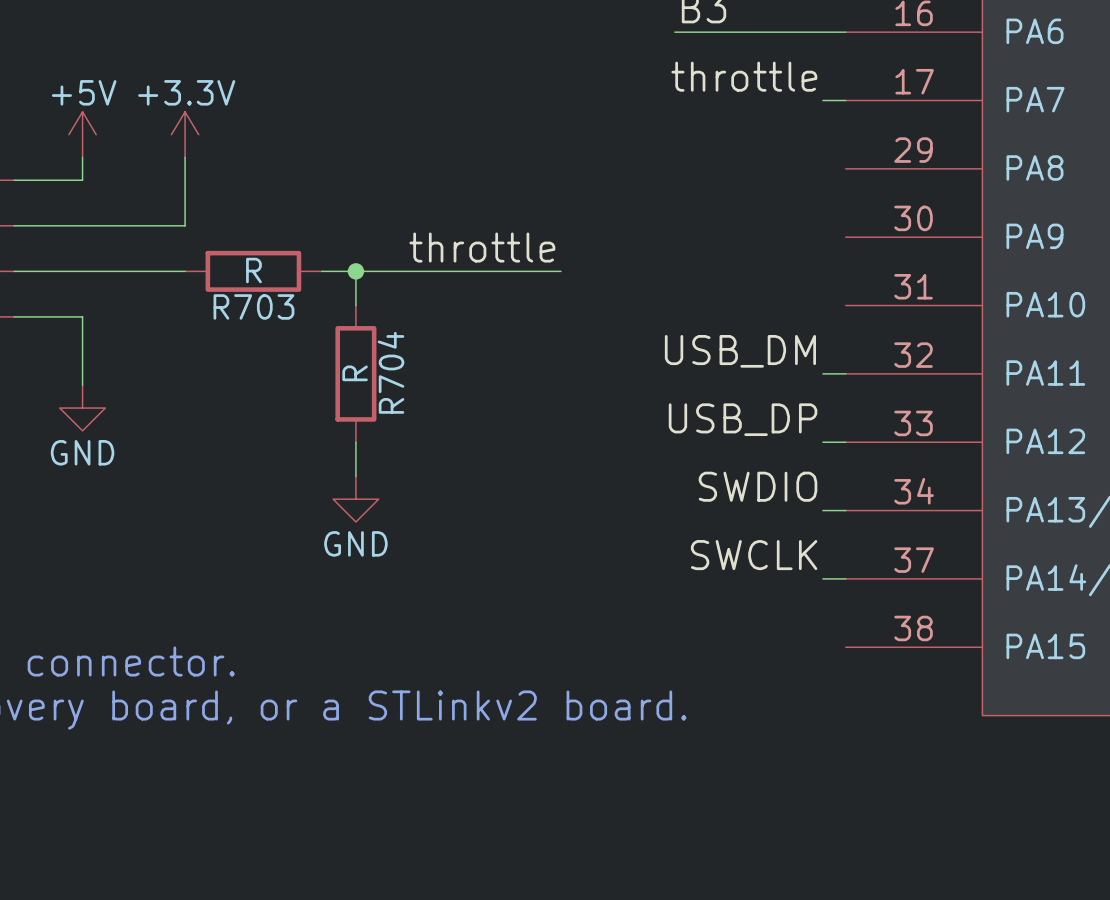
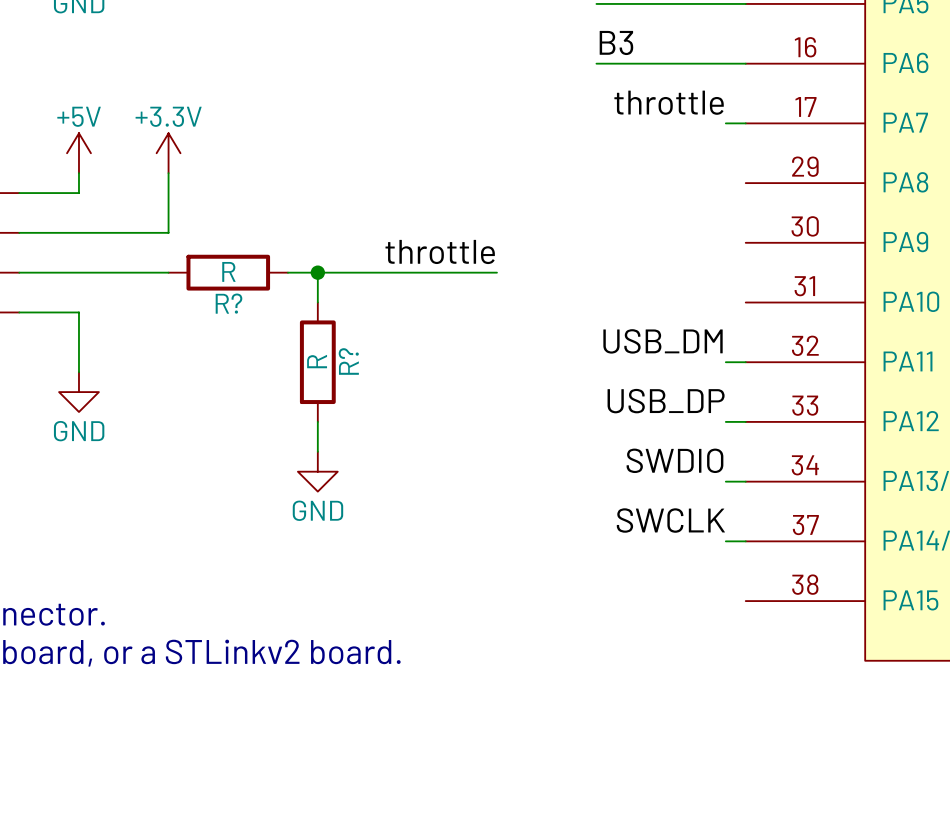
R703 name: R703 (253, 306) -> R? (228, 303)
R704 name: R704 (390, 372) -> R? (348, 361)

